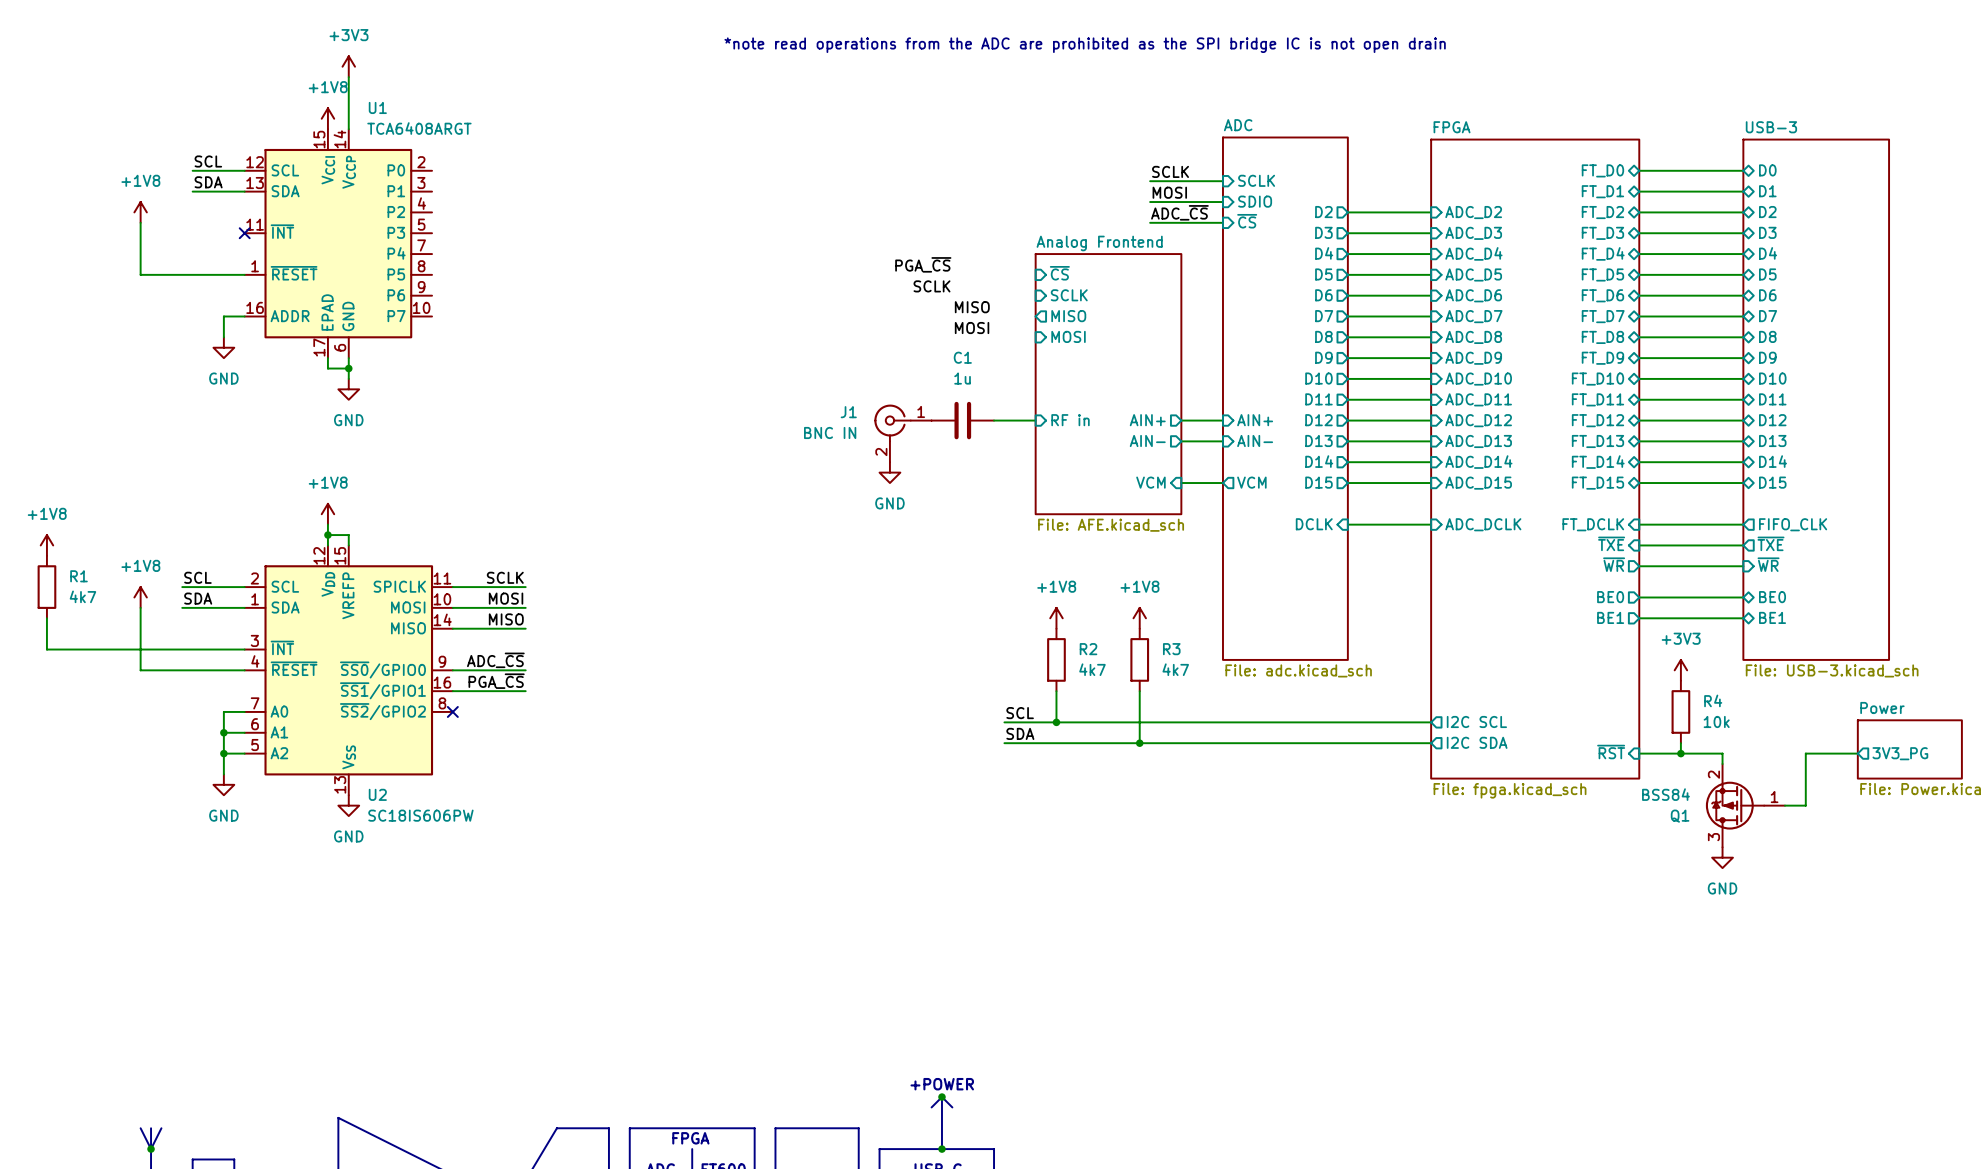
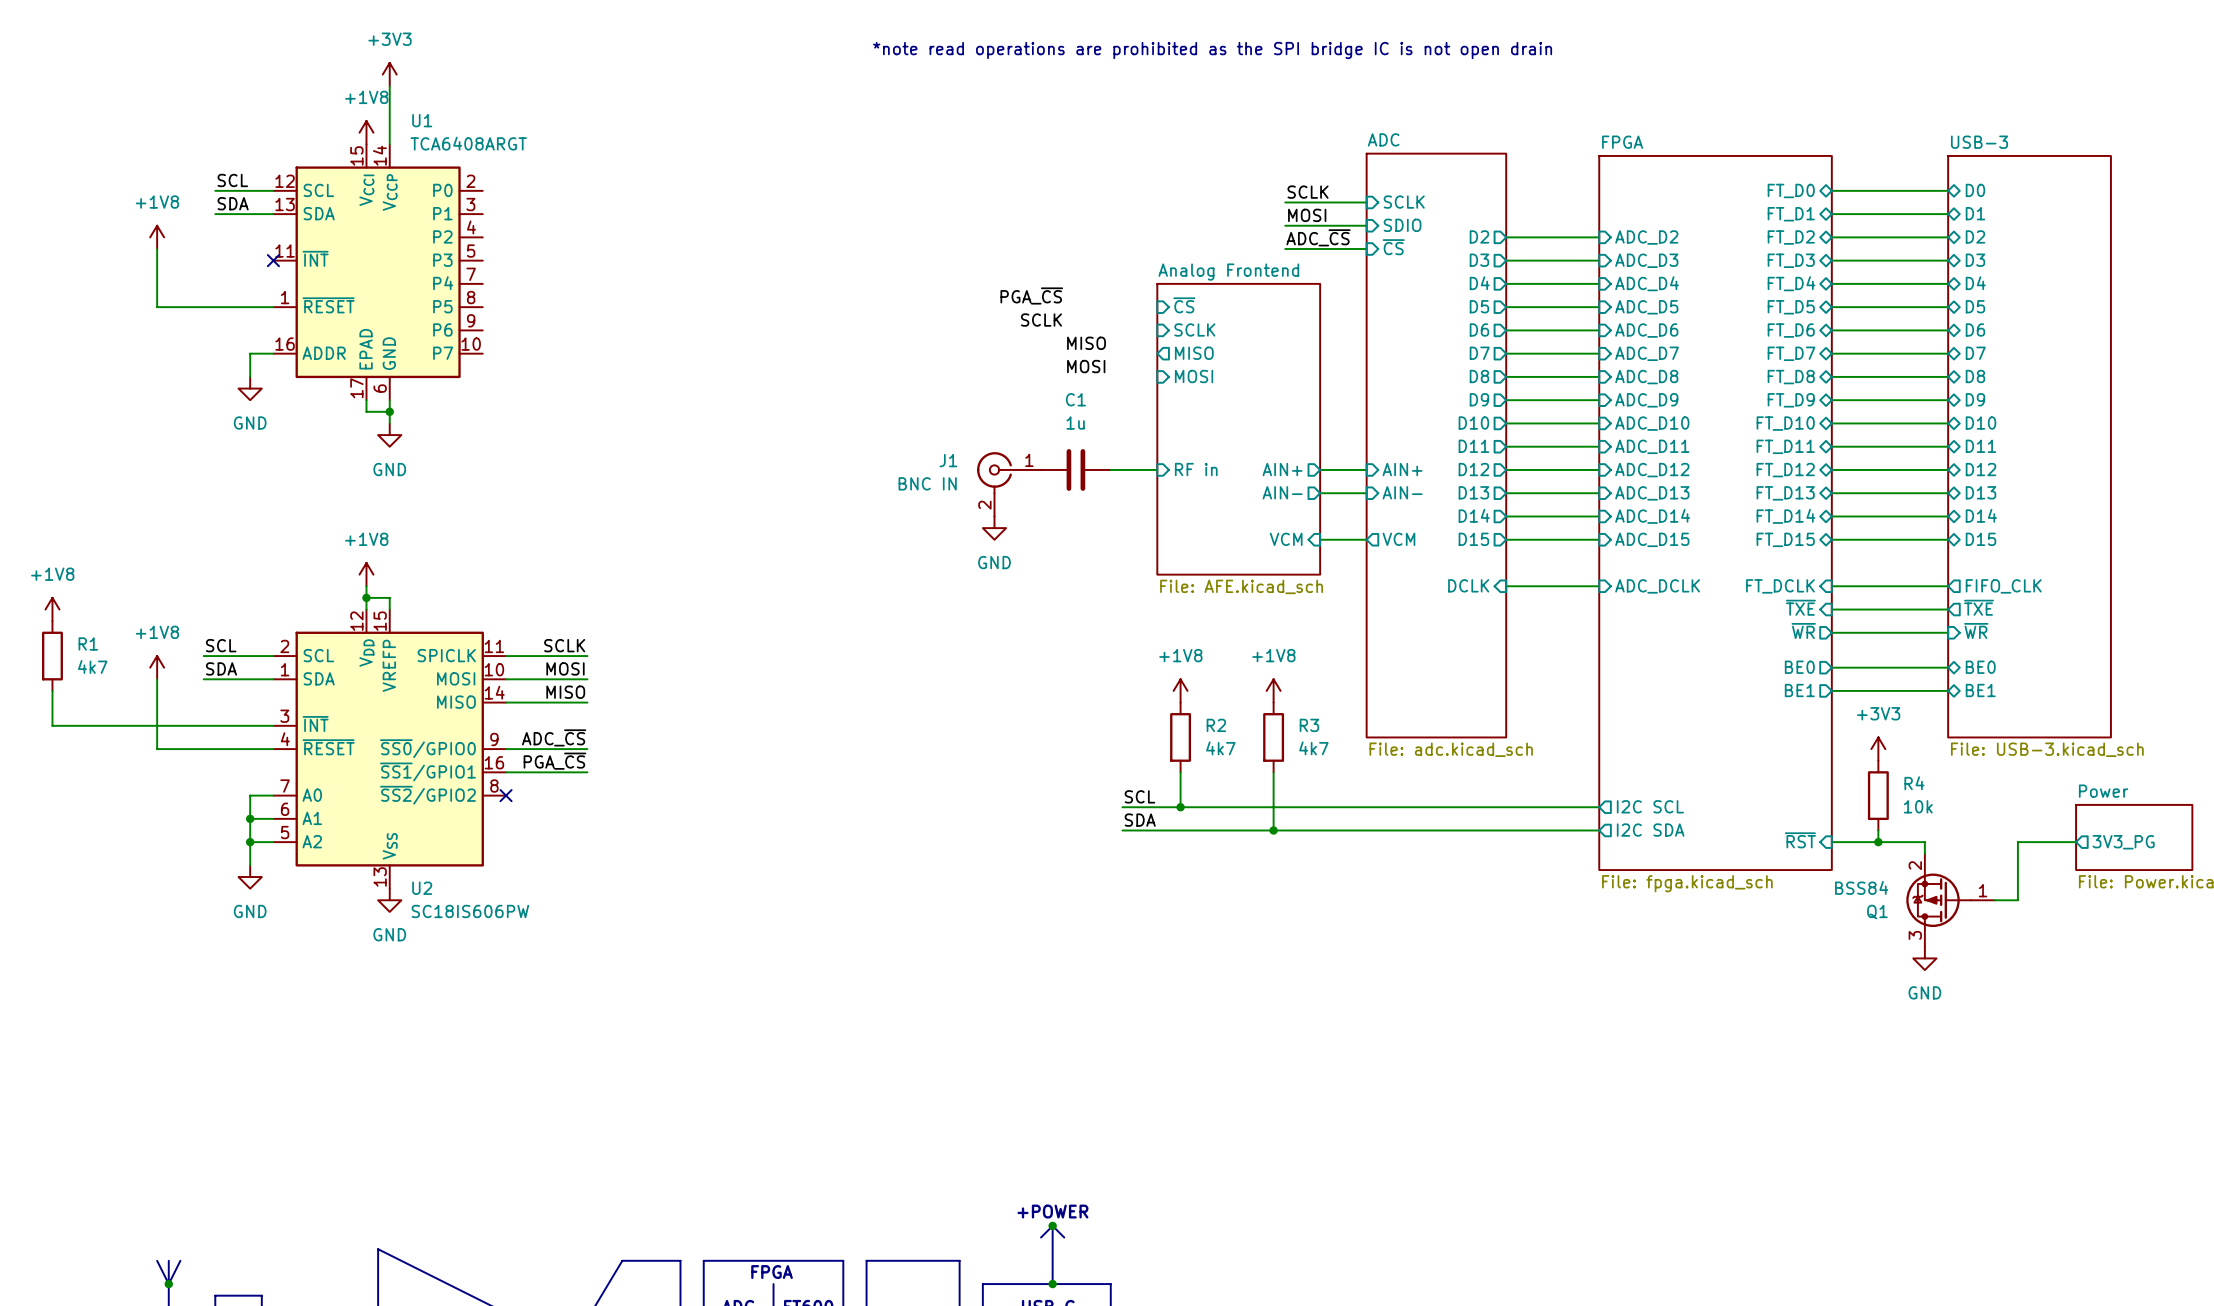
text: *note read operations from the ADC are prohibited as the SPI bridge IC is not open drain (1085, 45) -> *note read operations are prohibited as the SPI bridge IC is not open drain (1212, 50)

